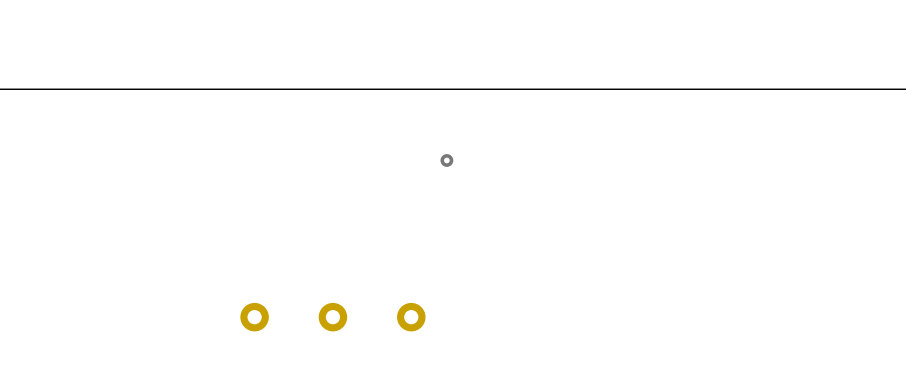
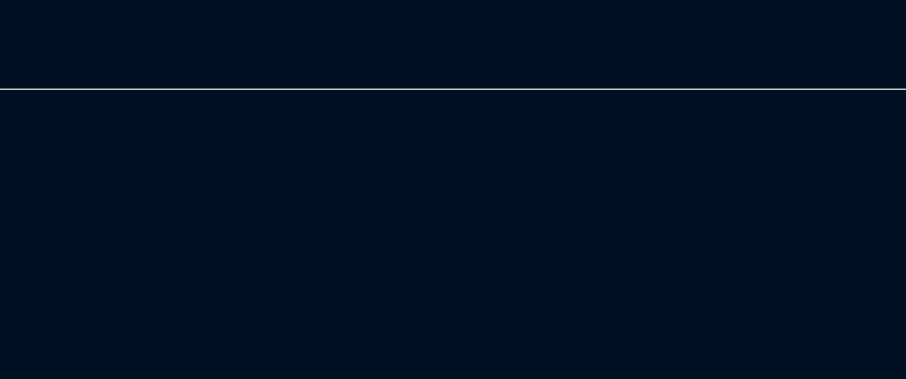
via: (446, 160) -> none
part: (254, 317) -> none
part: (332, 317) -> none
part: (411, 317) -> none

